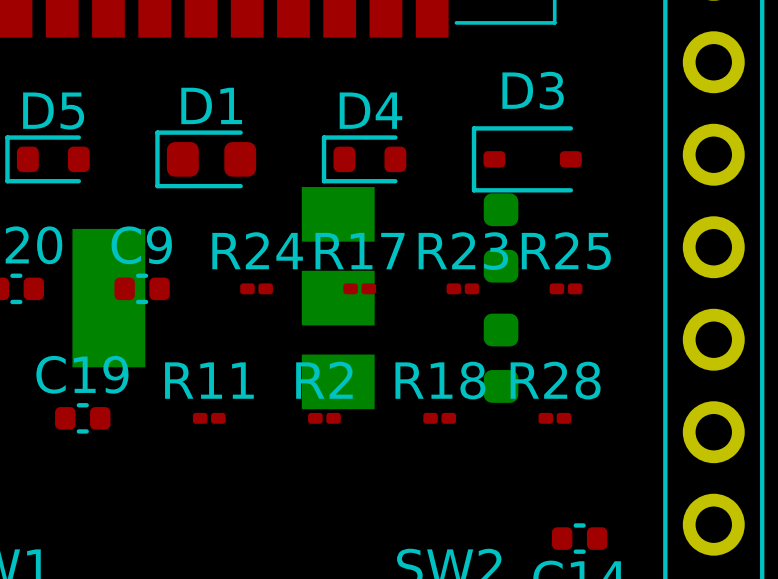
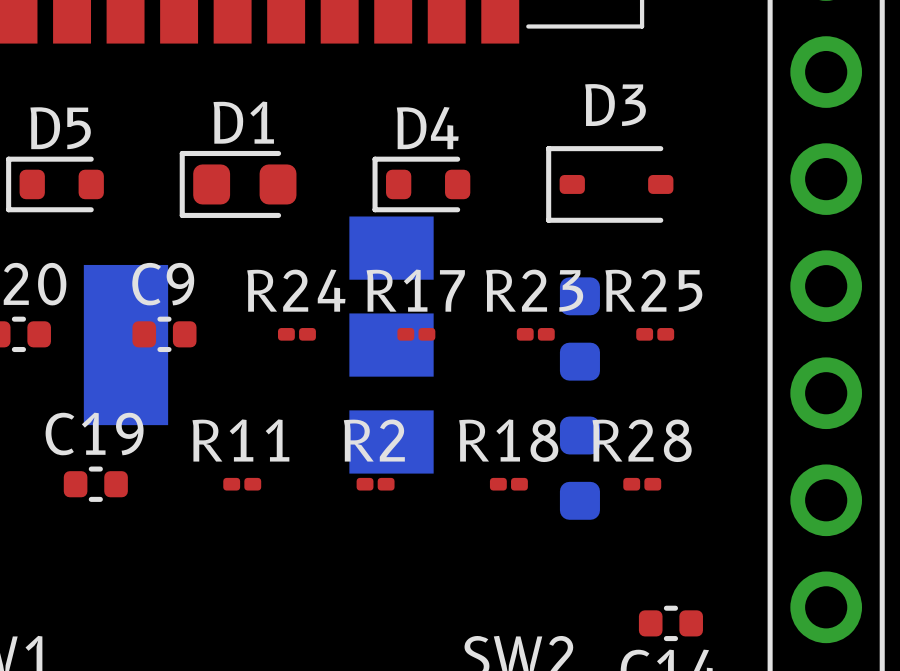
part: (501, 237) -> none
part: none -> (579, 328)
part: (501, 358) -> none
part: none -> (579, 468)

